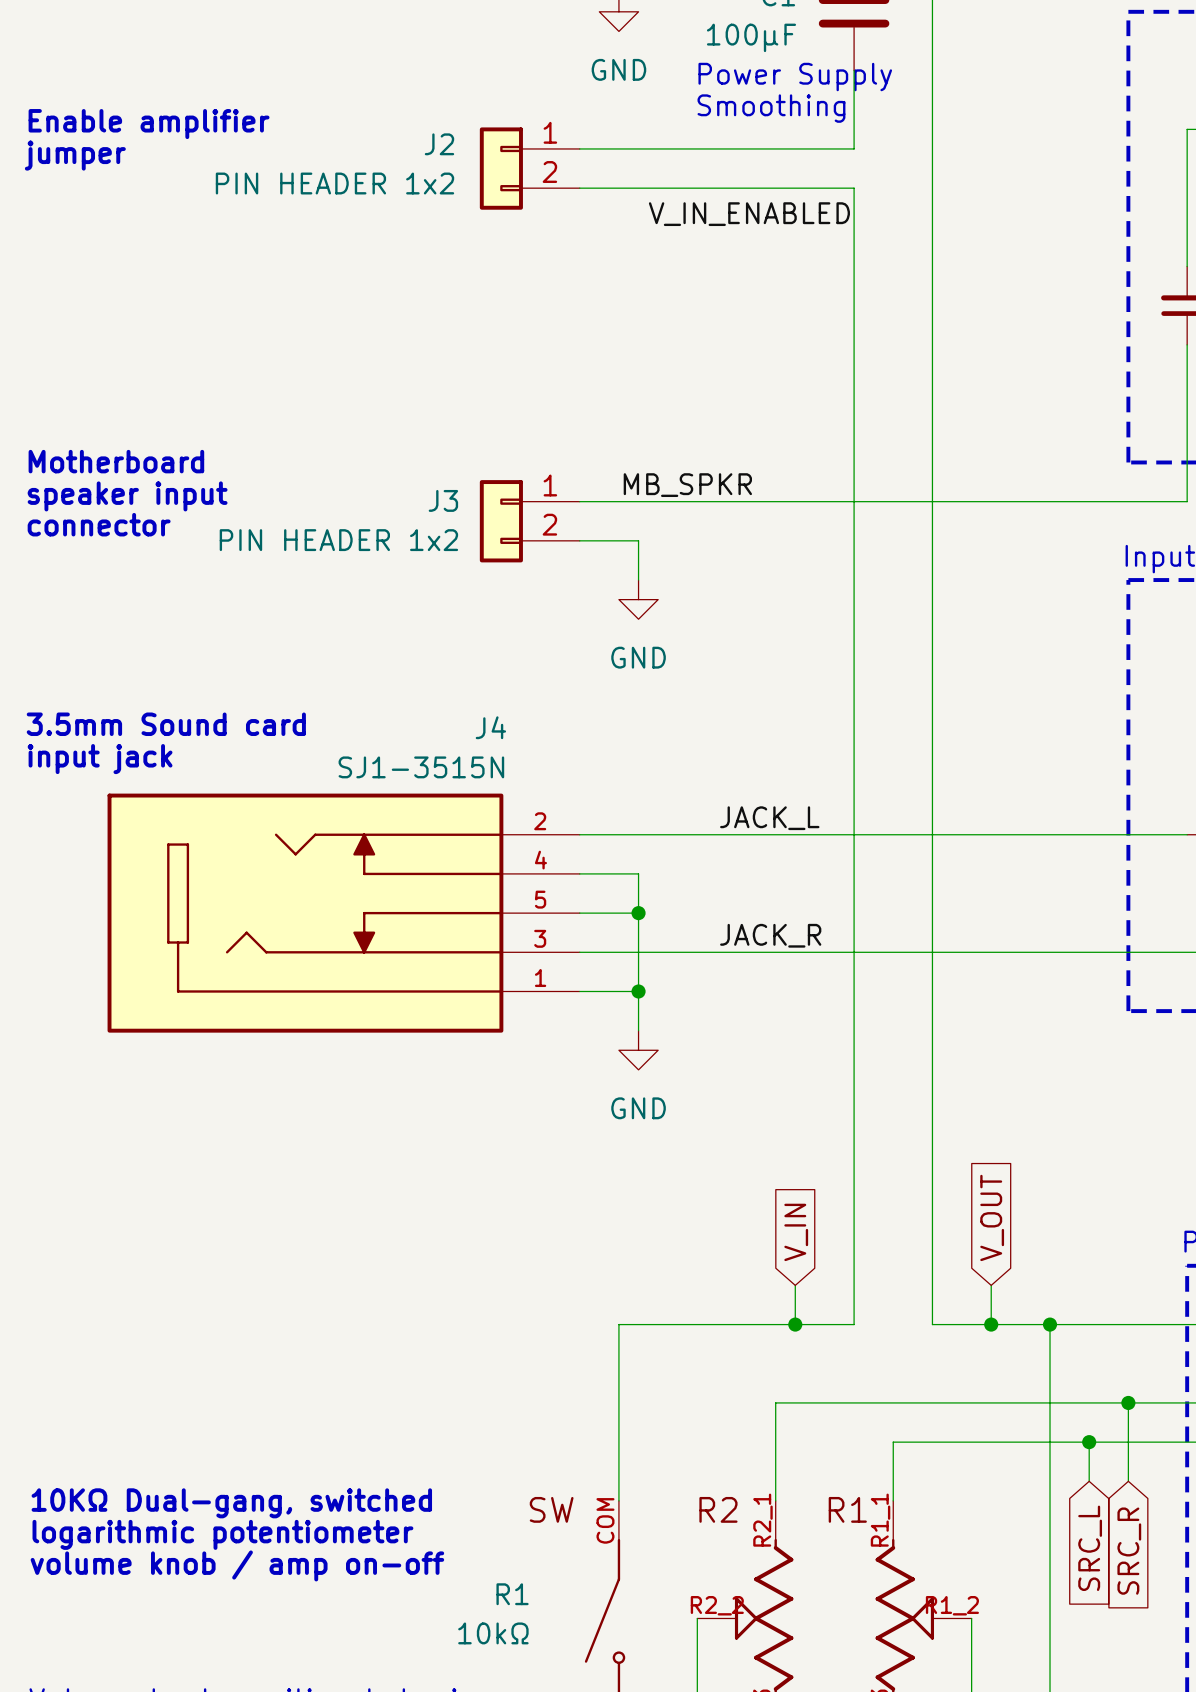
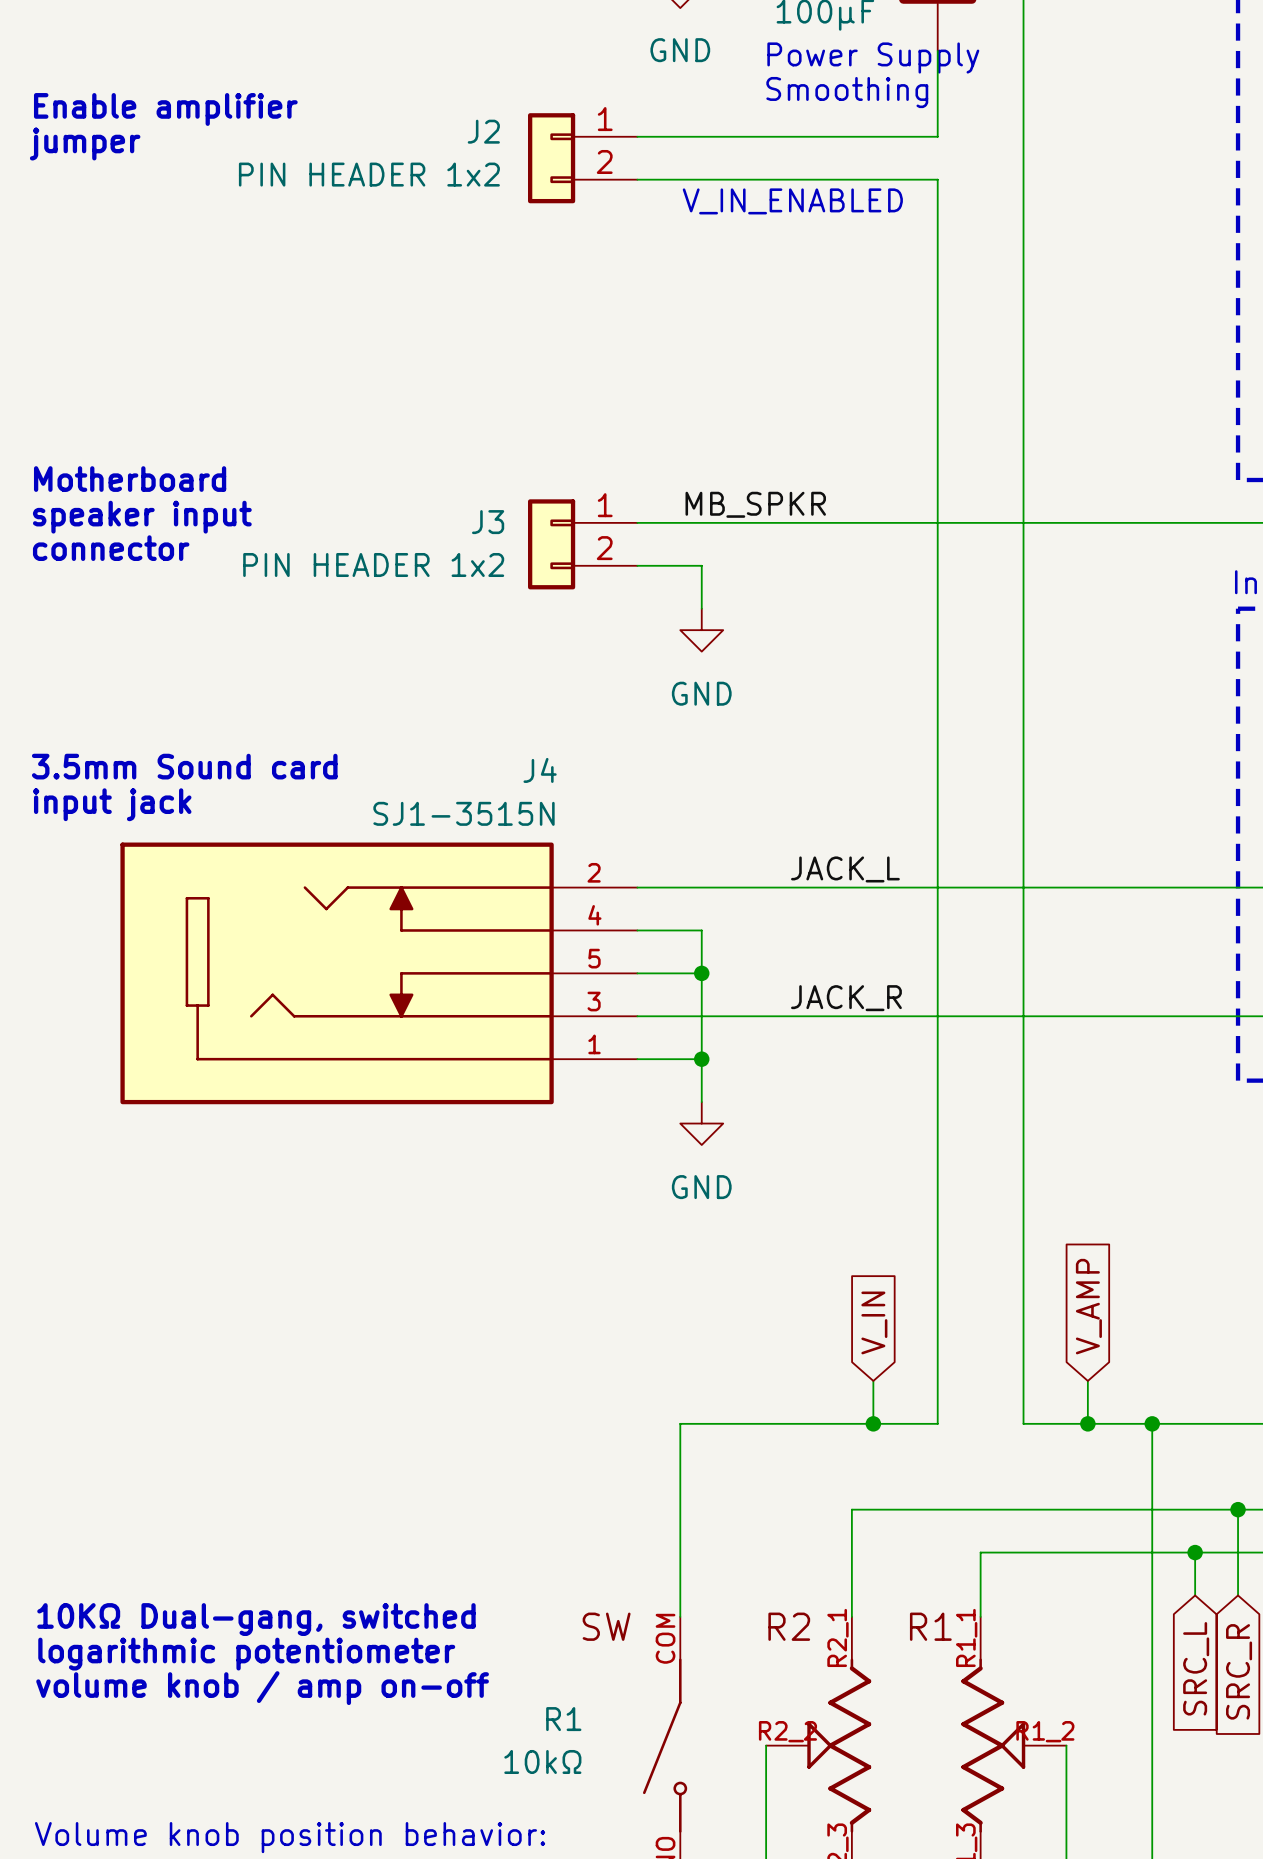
text: none -> V_IN_ENABLED (792, 201)
label: V_IN_ENABLED (749, 214) -> none
global label: V_OUT (992, 1217) -> V_AMP (1088, 1306)

